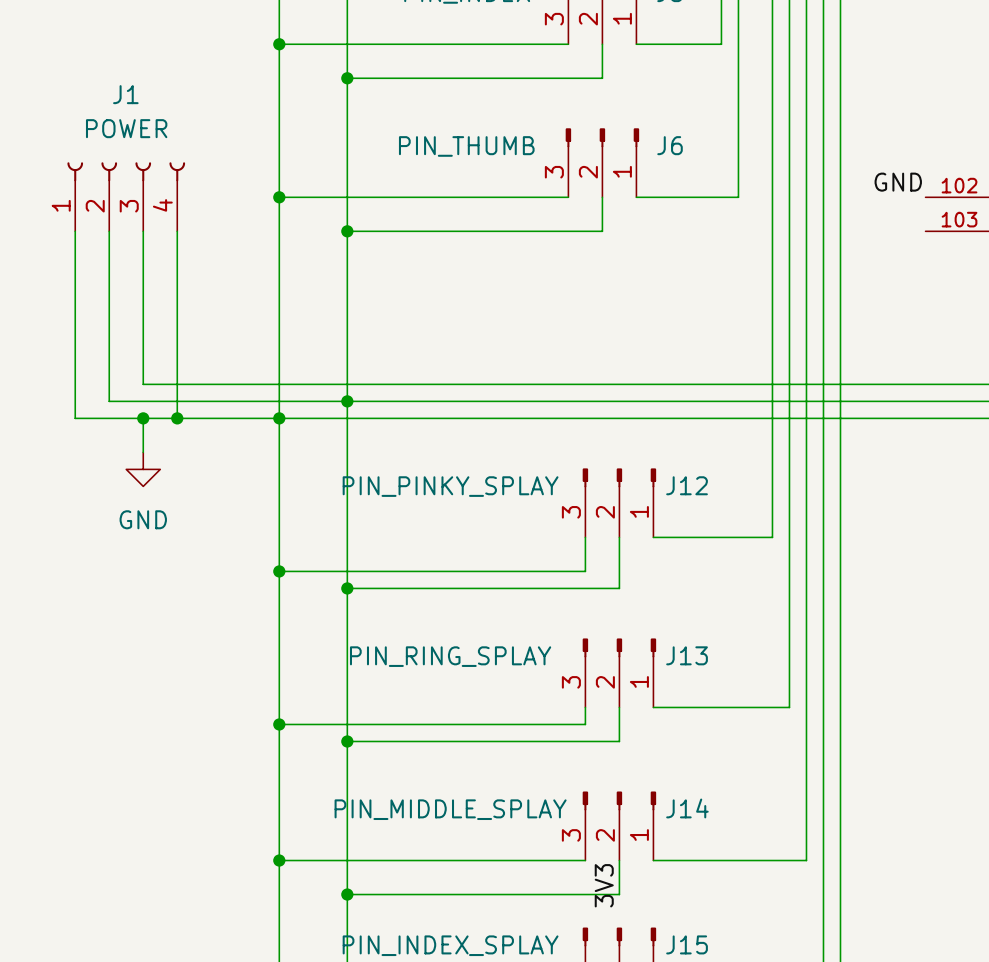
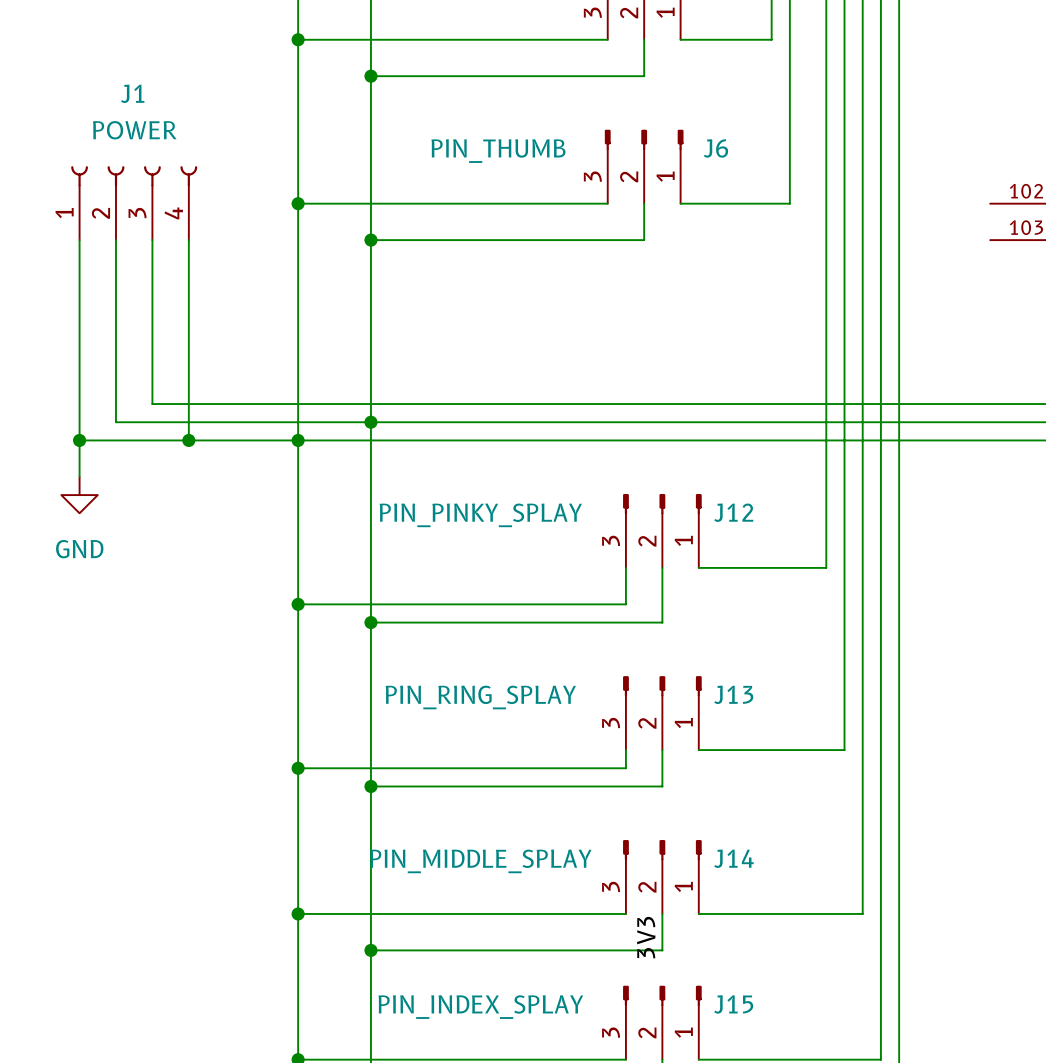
label: GND (898, 182) -> none
wire: (143, 418) (143, 452) -> (79, 440) (79, 476)
junction position: (143, 418) -> (79, 440)
power symbol position: GND (143, 469) -> GND (79, 495)

